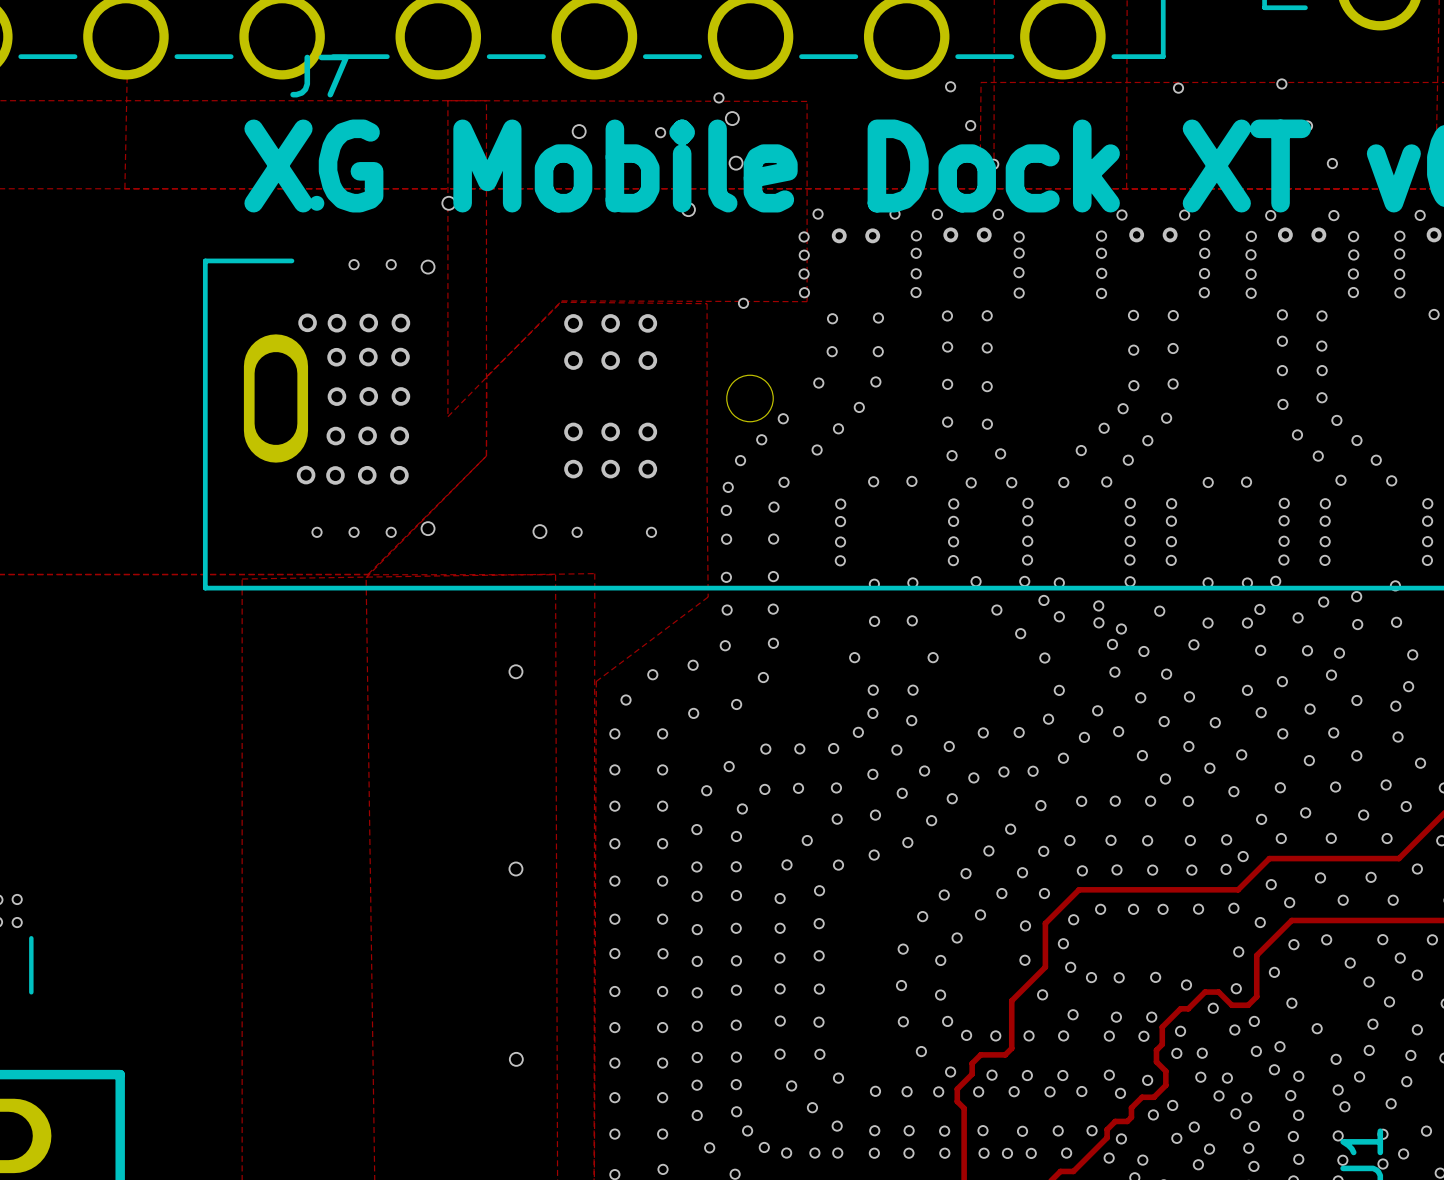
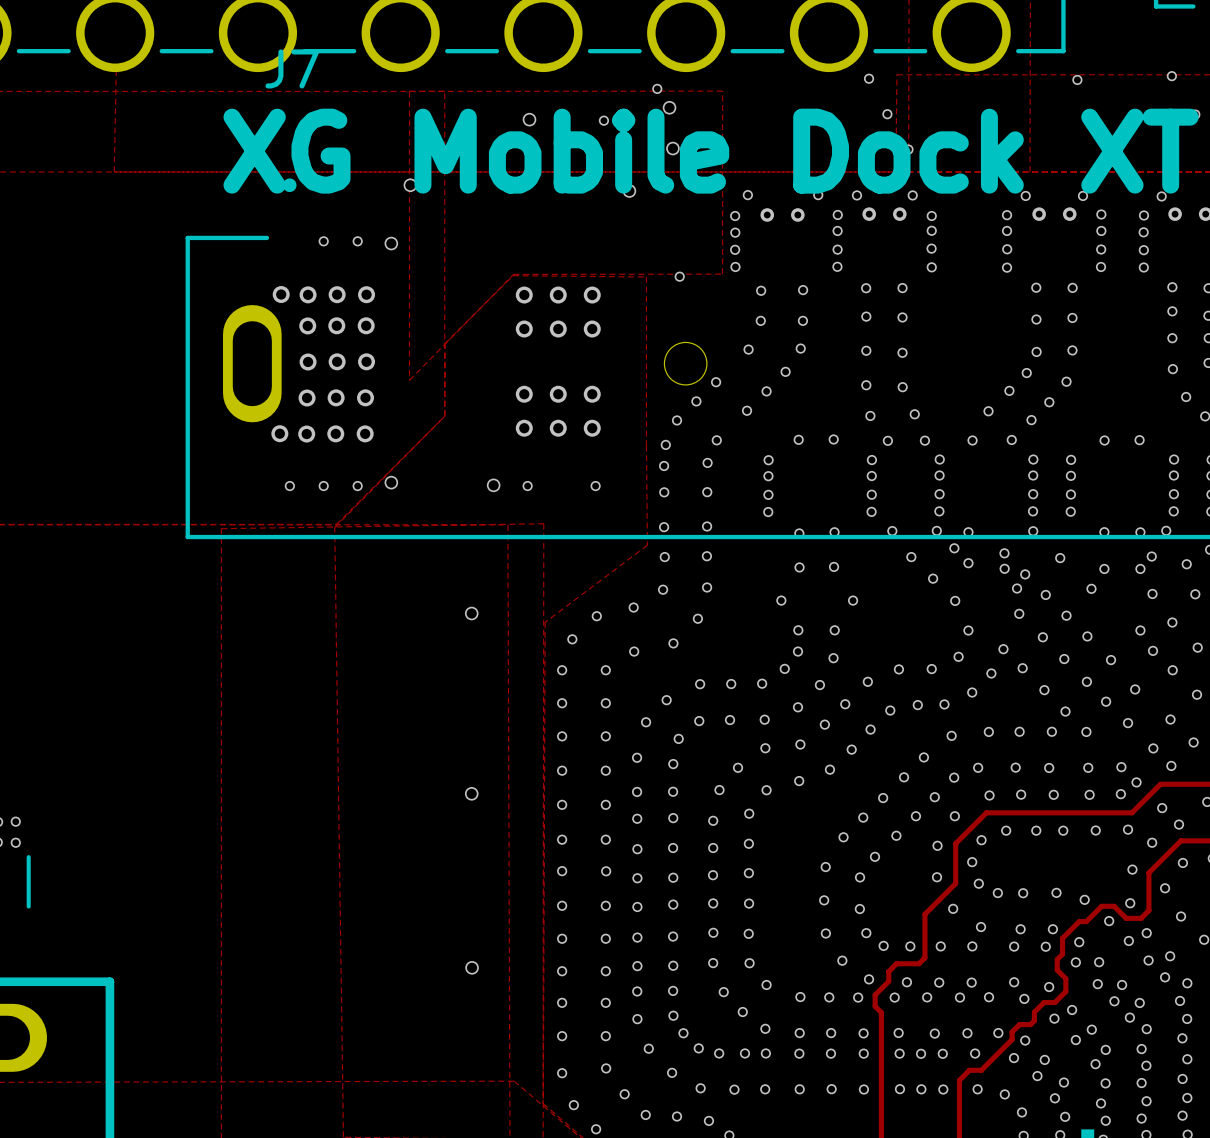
zone outline: (447, 100) (807, 101) (807, 301) (561, 300) -> (409, 91) (722, 91) (722, 274) (513, 274)

